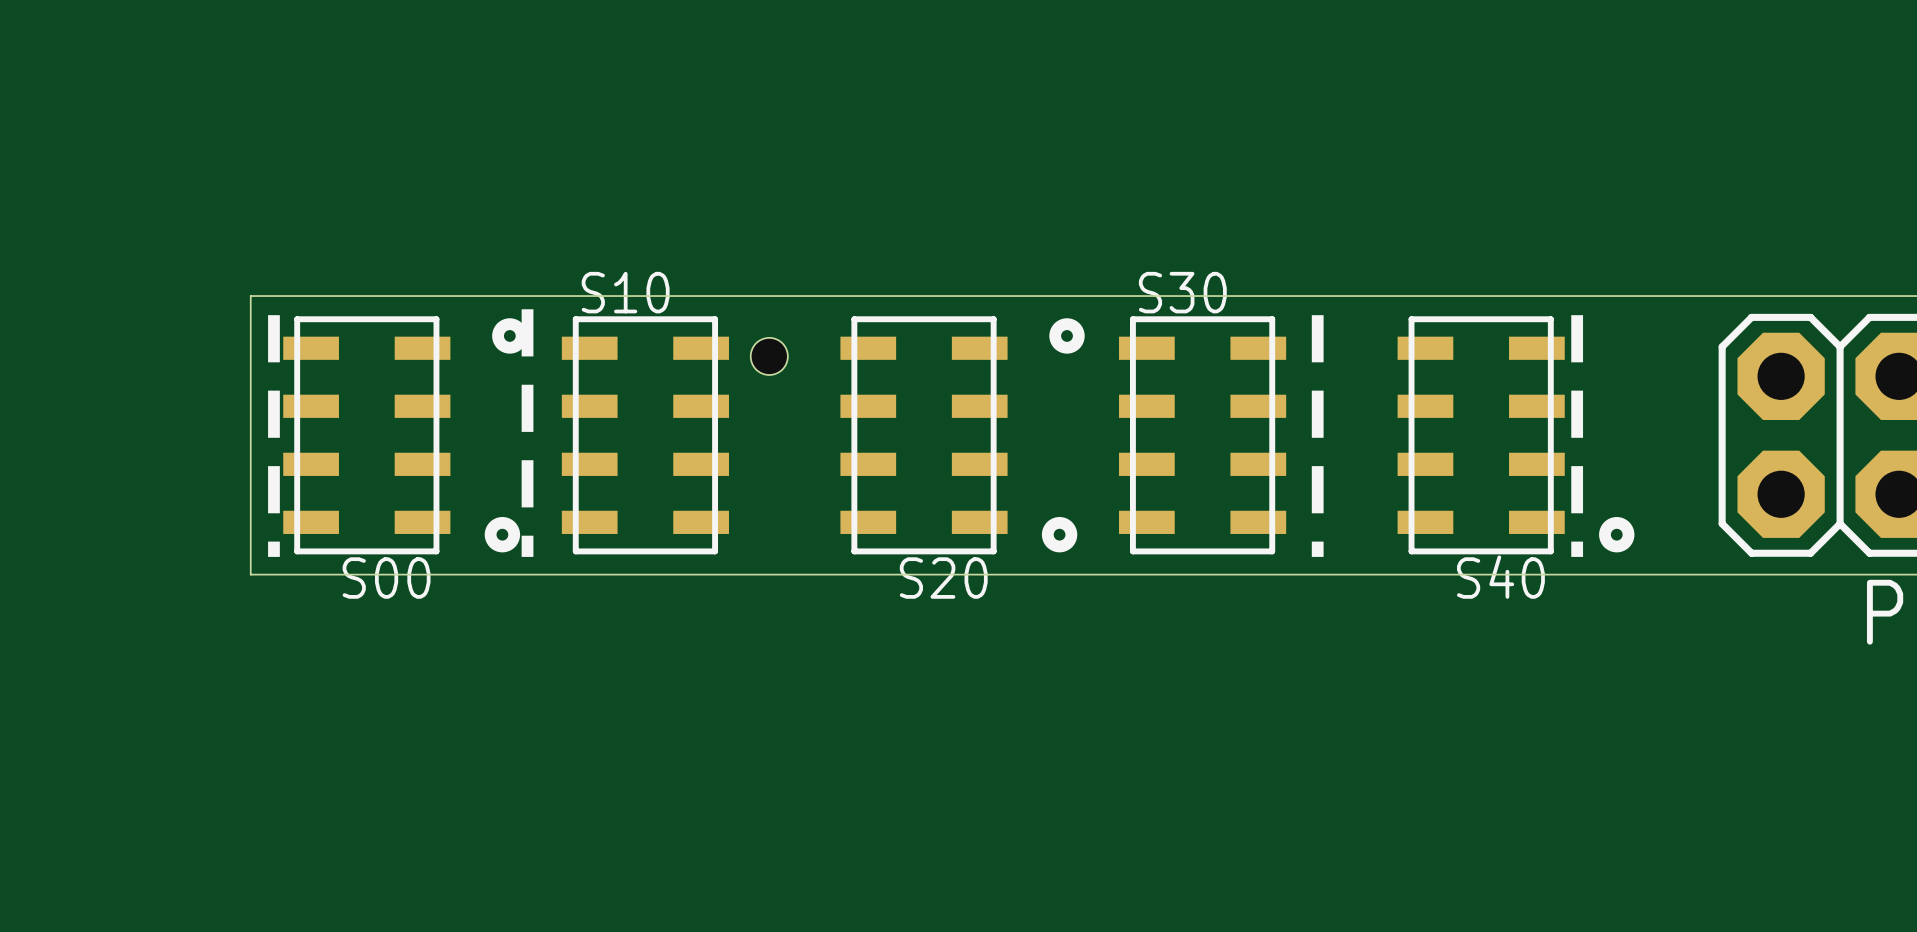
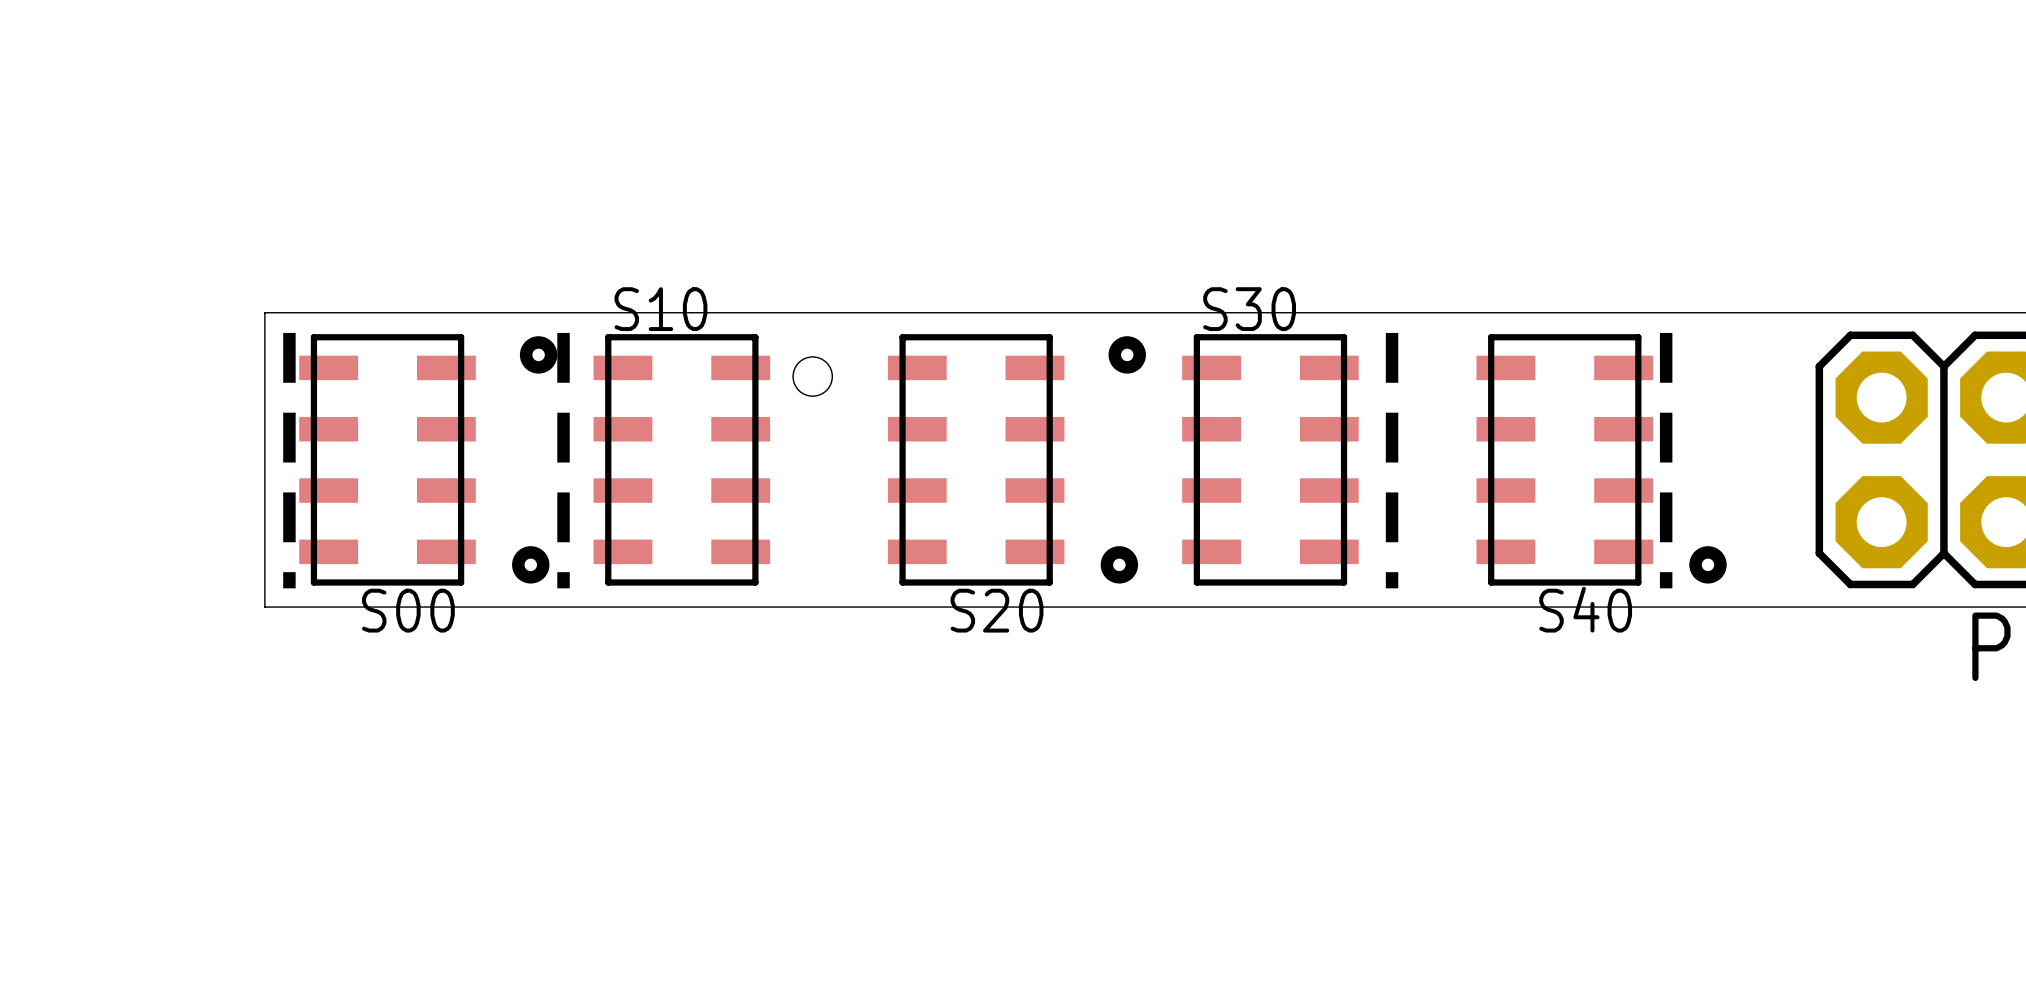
line: (527, 309) (527, 556) -> none
line: none -> (563, 332) (563, 588)

